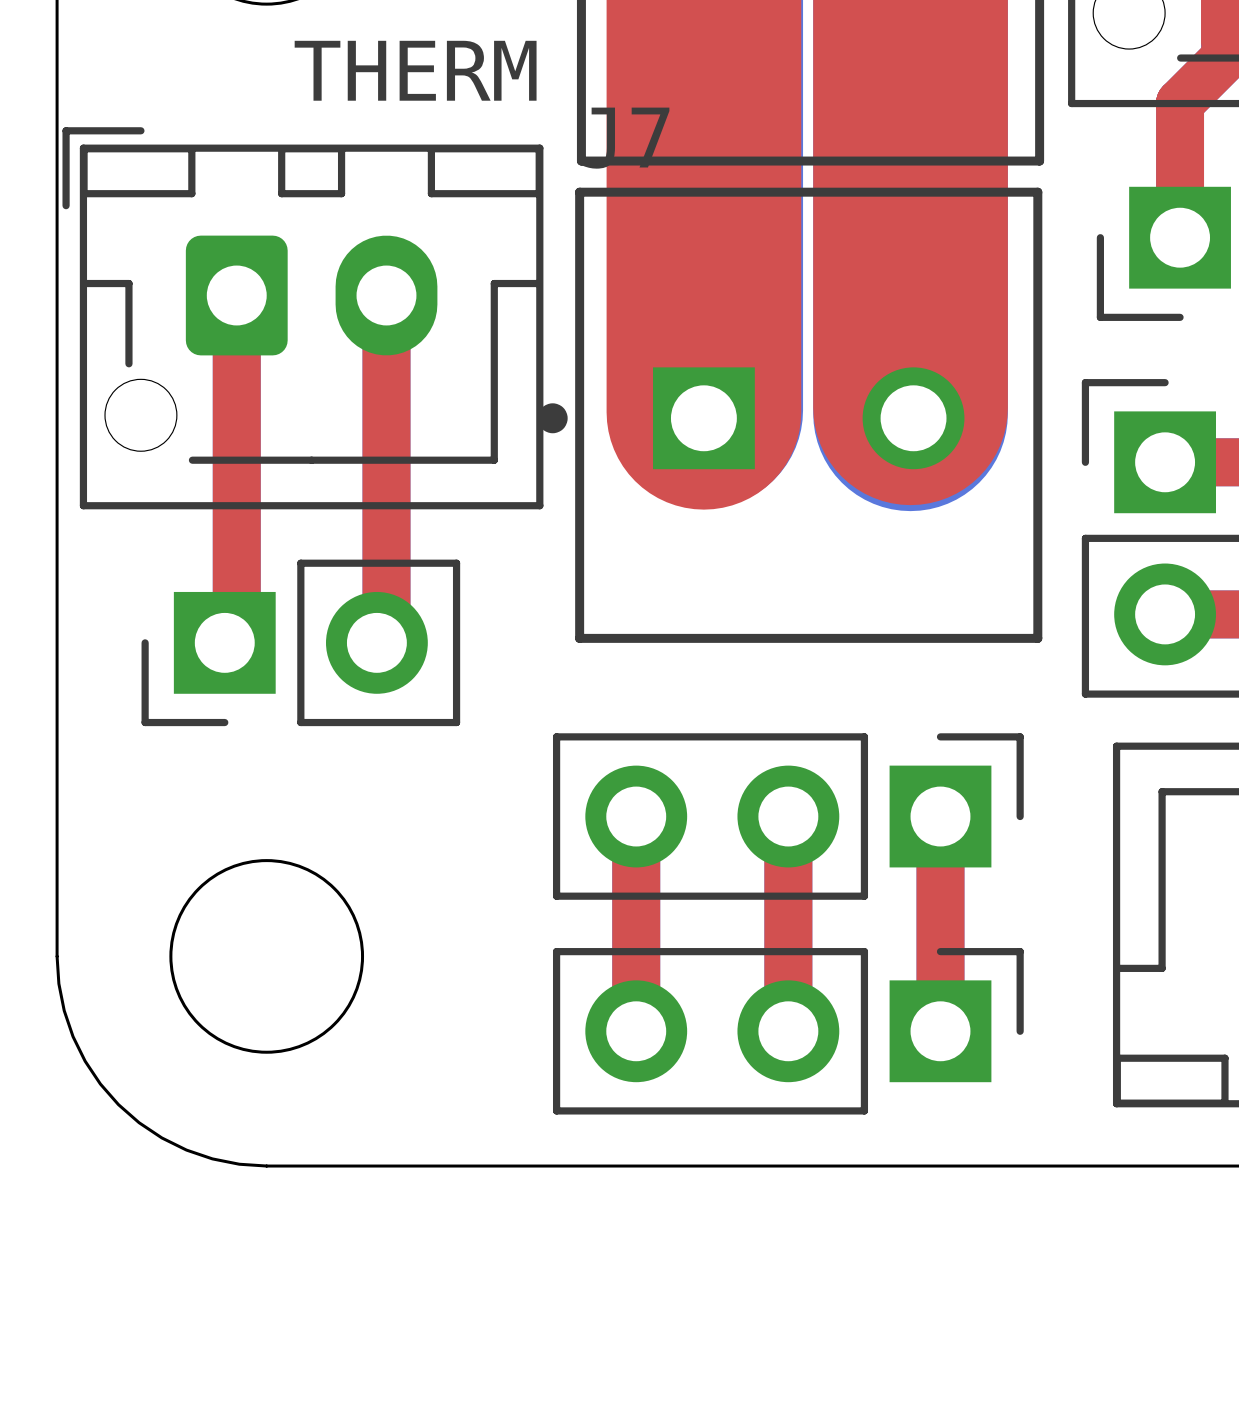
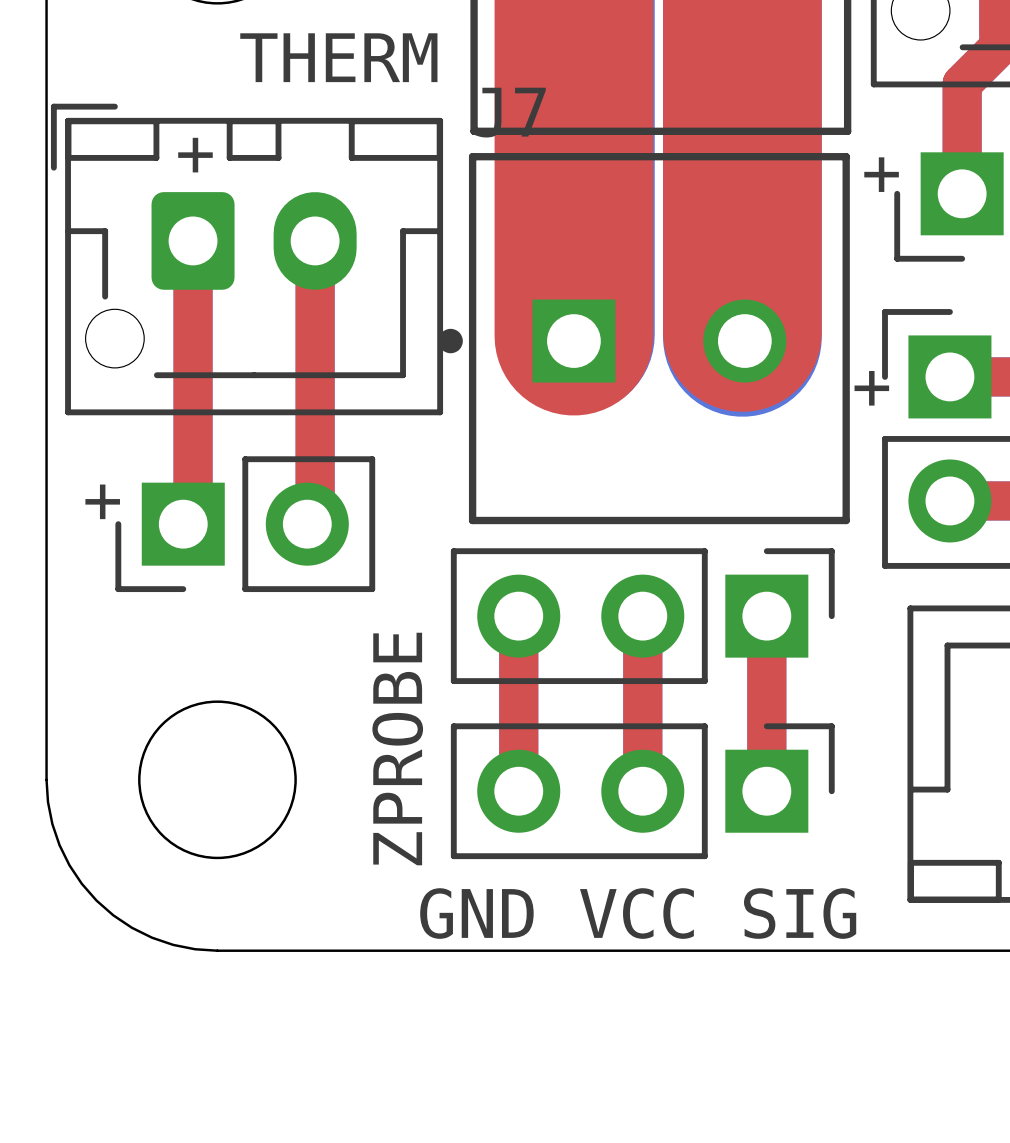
text: none -> + (195, 155)
text: none -> + (881, 174)
text: none -> + (871, 388)
text: none -> + (102, 501)
part position: (788, 816) -> (642, 616)
text: none -> ZPROBE (397, 749)
part position: (788, 1031) -> (642, 791)
text: none -> GND VCC SIG (638, 913)

